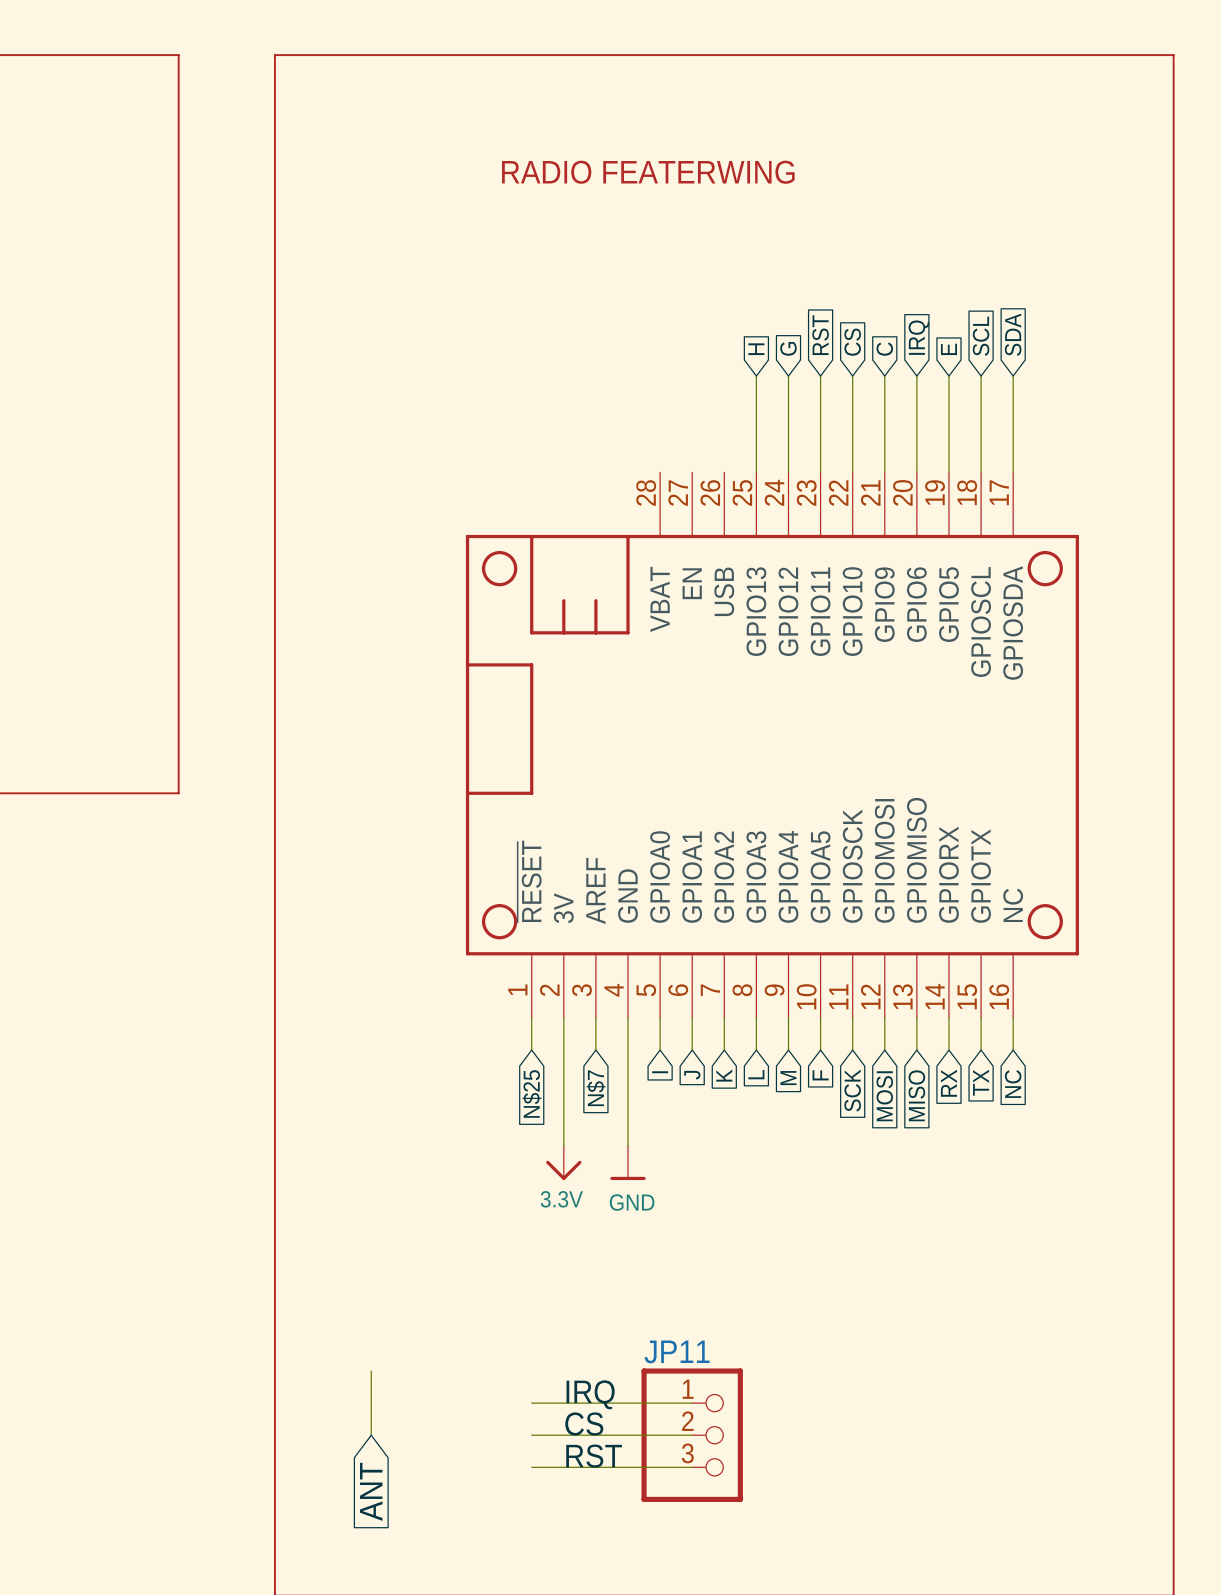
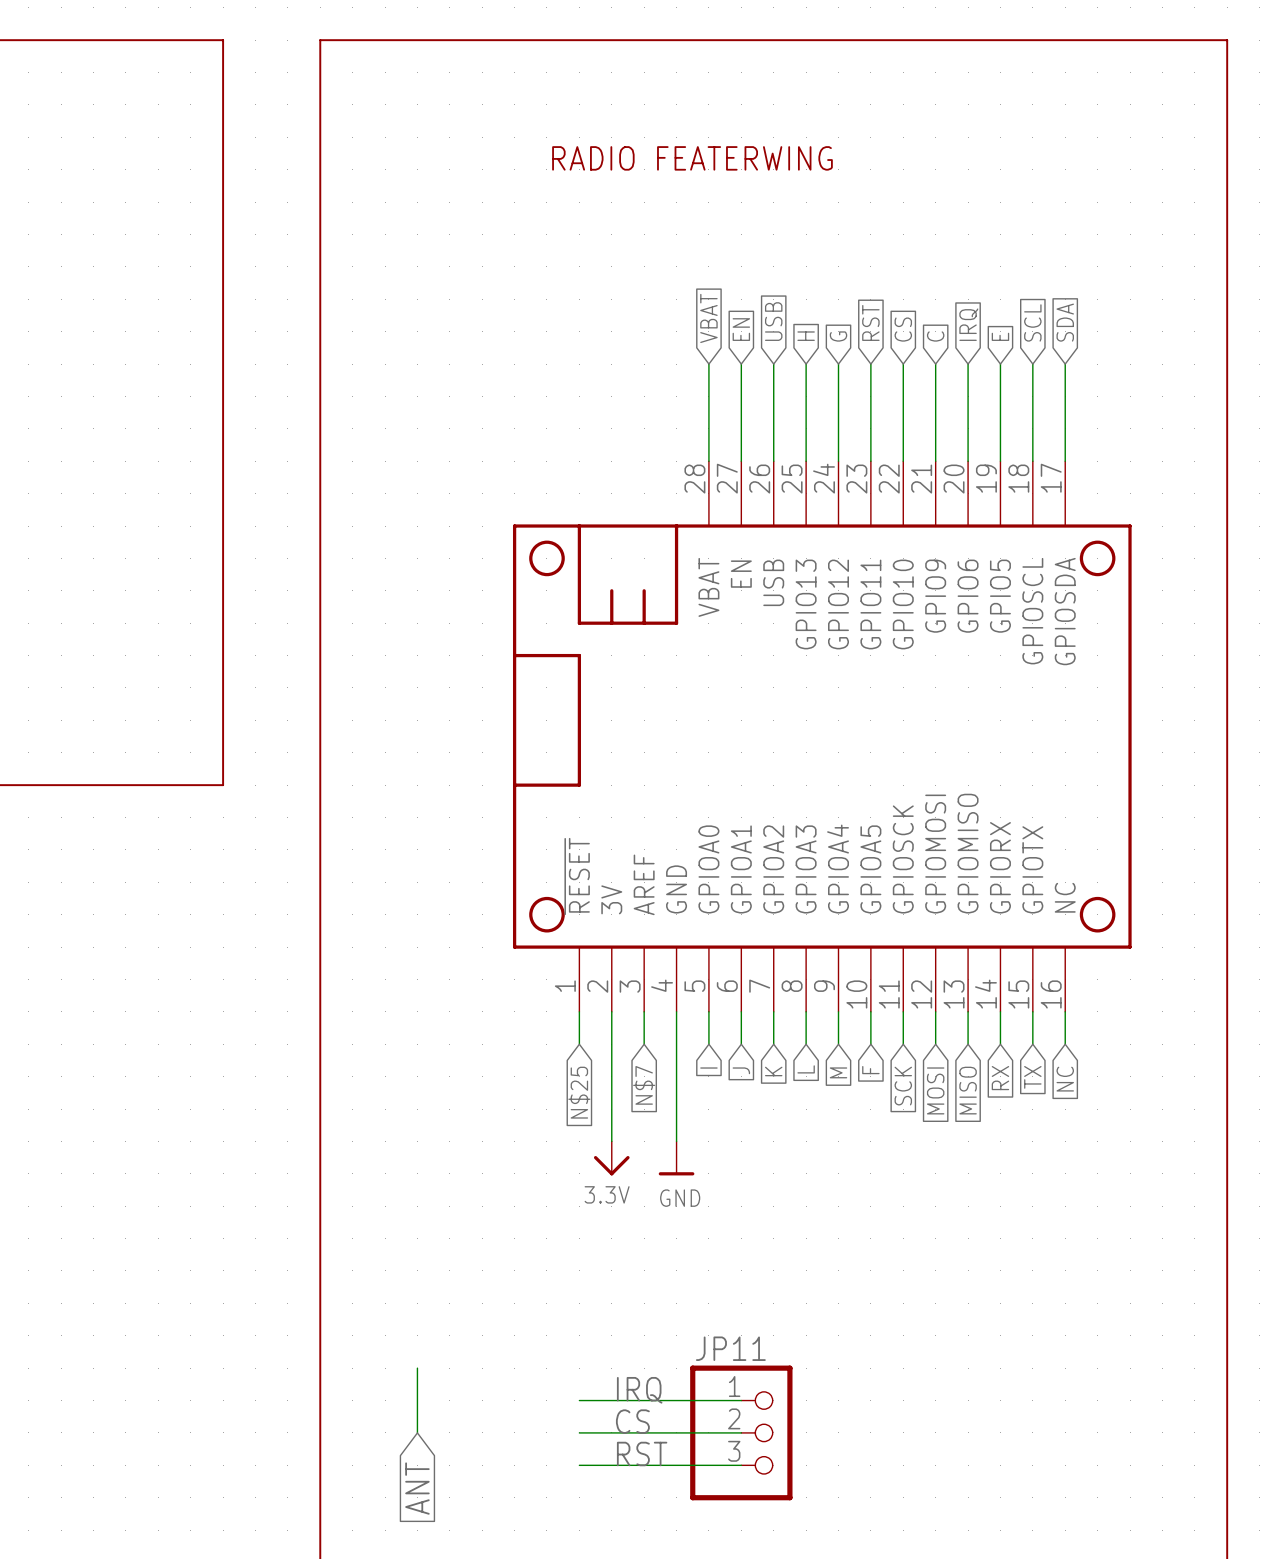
global label: none -> VBAT (708, 318)
global label: none -> USB (773, 321)
global label: none -> EN (741, 329)
wire: none -> (708, 364) (708, 461)
wire: none -> (741, 364) (741, 461)
wire: none -> (773, 364) (773, 461)

